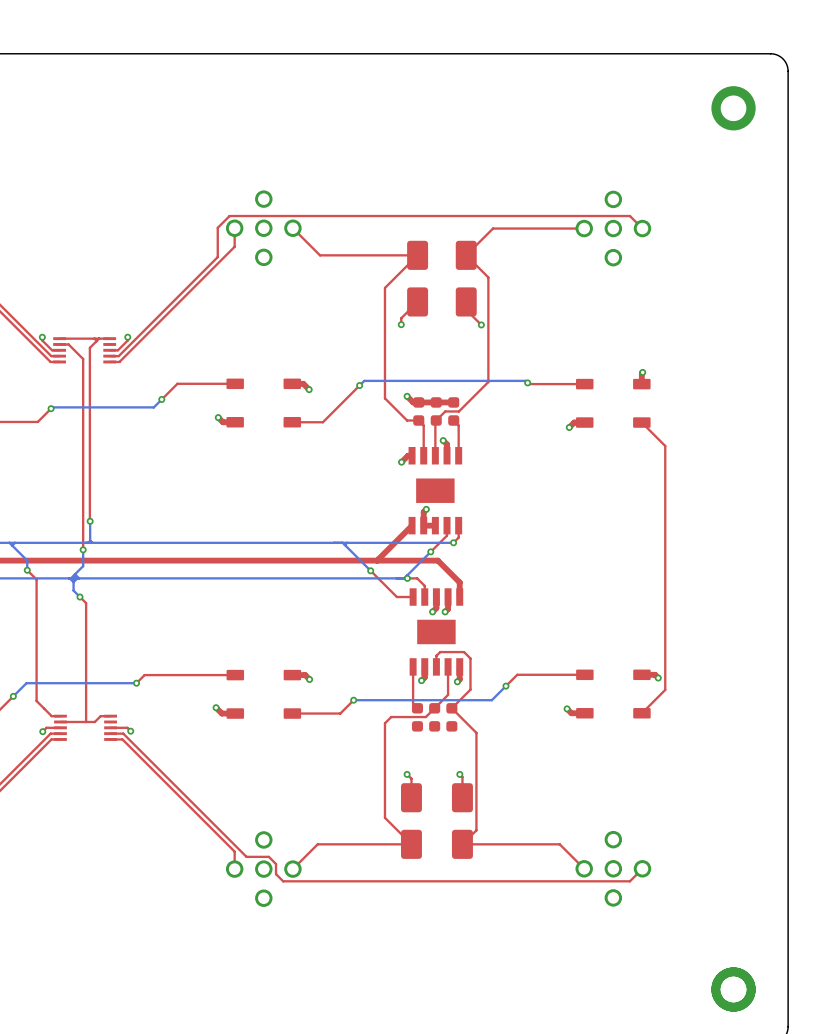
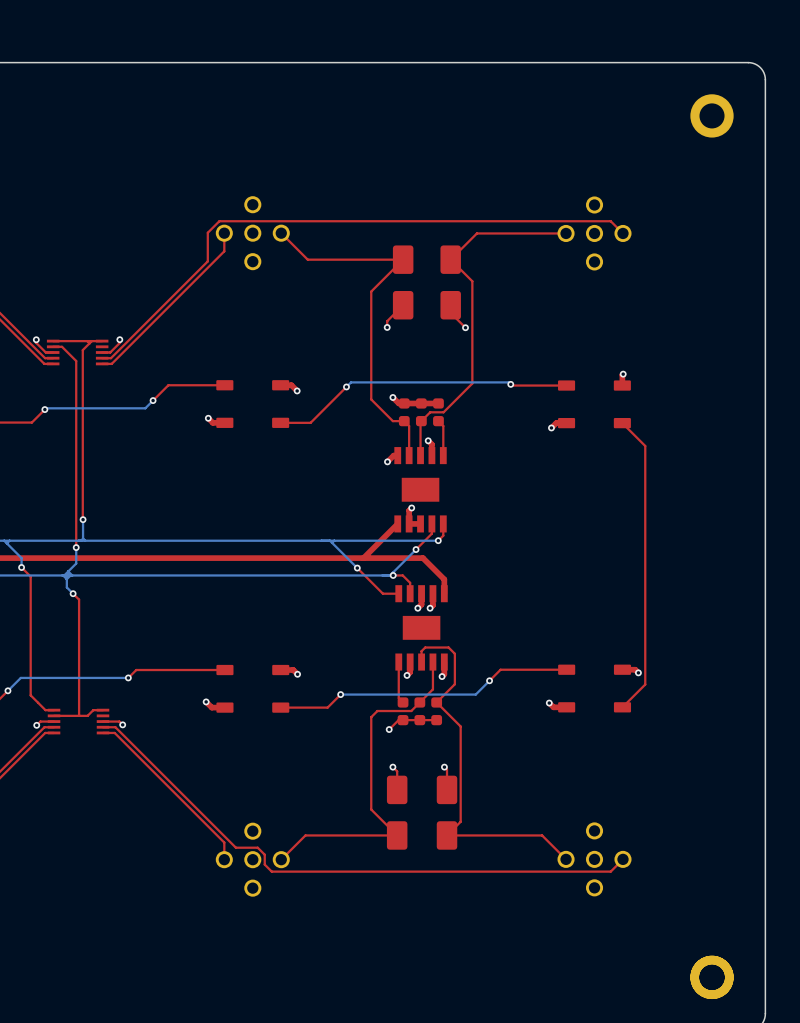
top track: none -> (436, 720) (398, 720) (389, 729)
via: none -> (389, 729)

